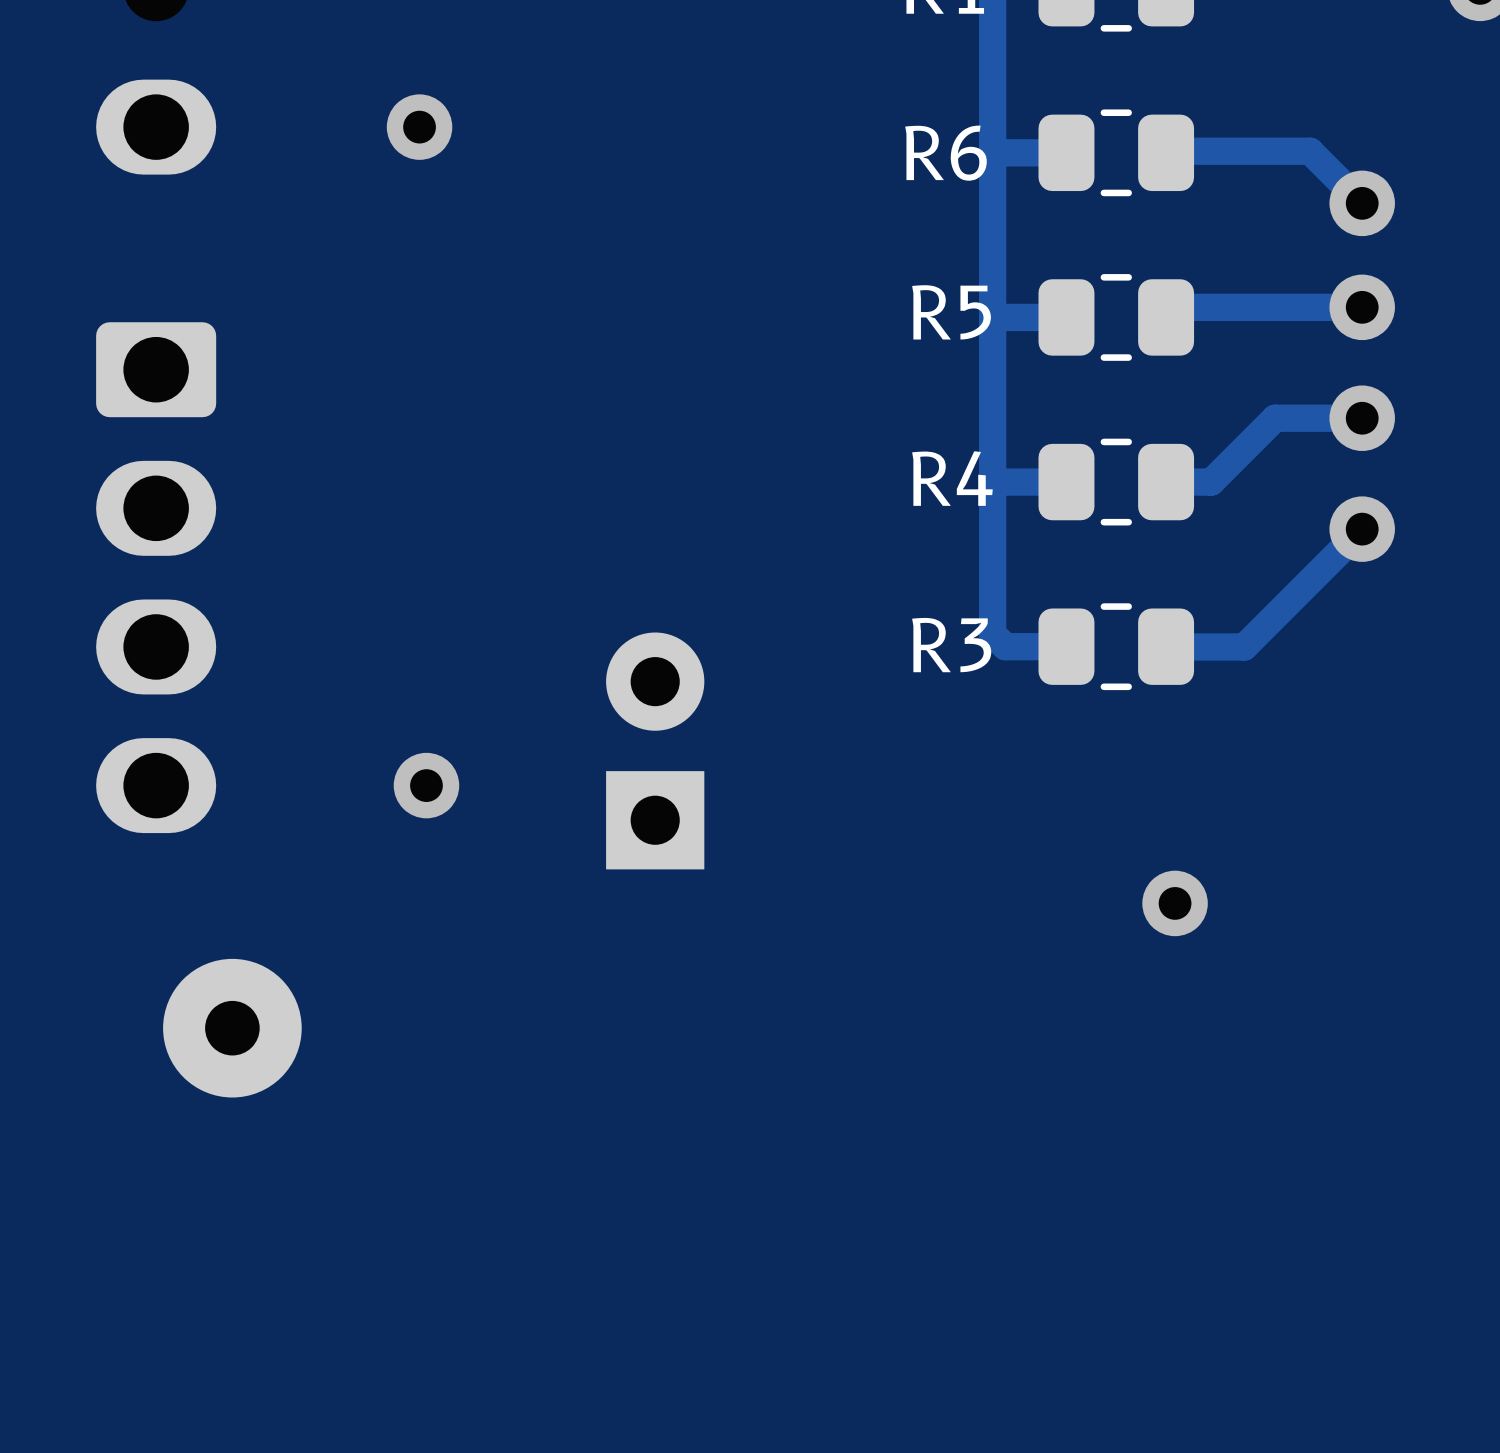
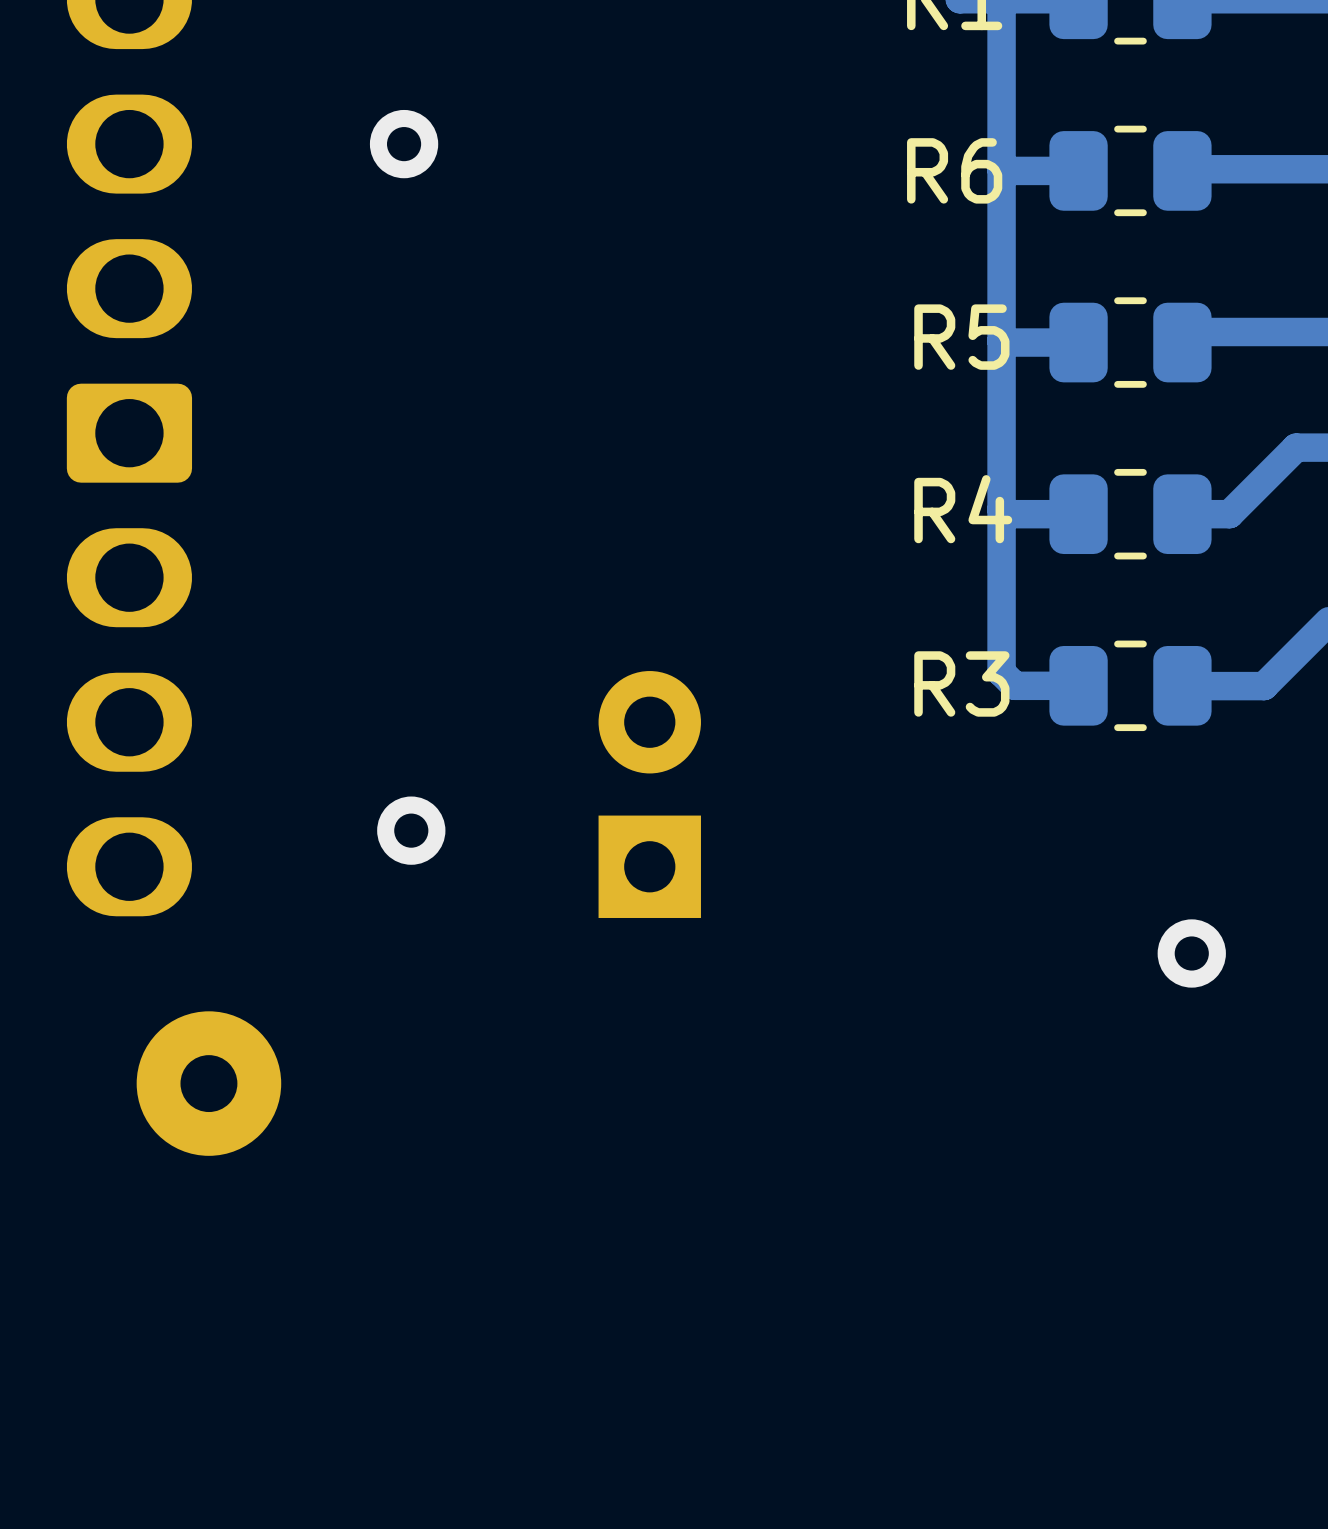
part: none -> (129, 288)
part position: (156, 577) -> (129, 649)

